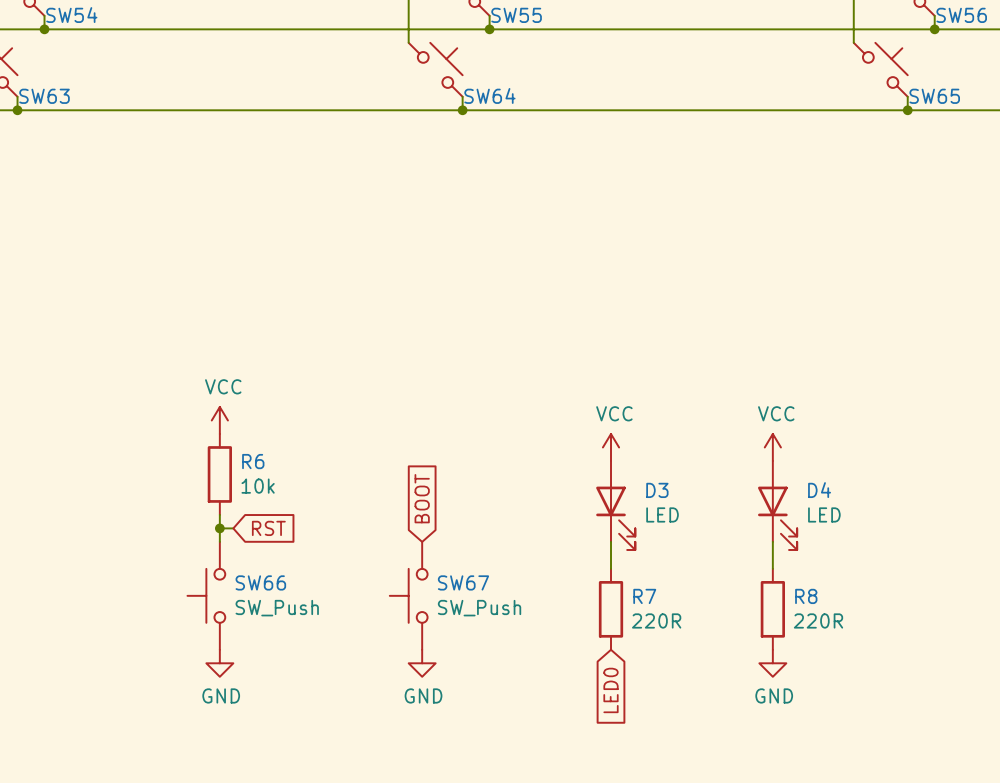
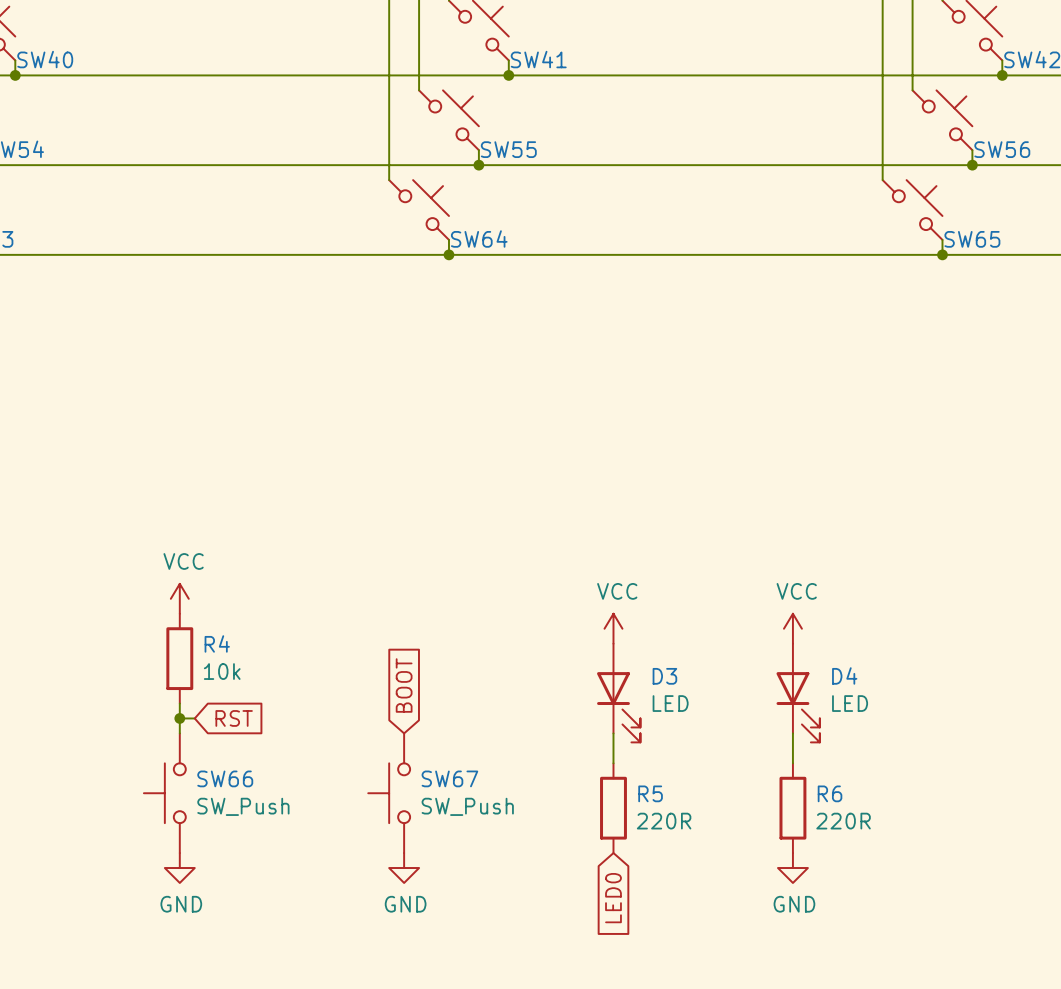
R6 name: R6 (253, 461) -> R4 (217, 643)
R7 name: R7 (644, 596) -> R5 (650, 793)
R8 name: R8 (806, 596) -> R6 (830, 793)

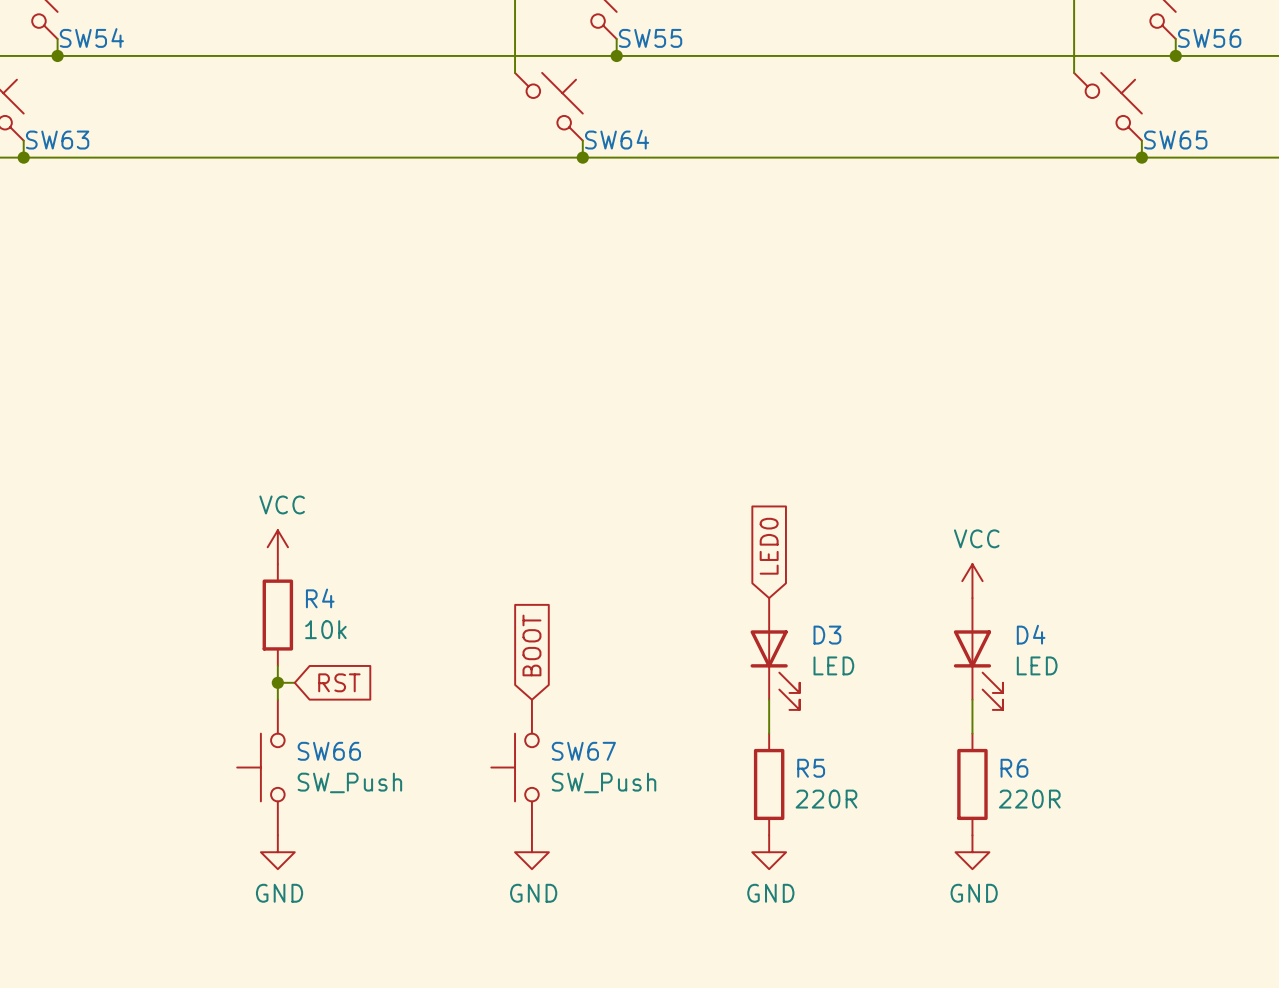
power symbol: VCC (613, 628) -> none
power symbol: none -> GND (769, 852)
global label rotation: 0° (613, 898) -> 180° (769, 546)
global label position: LED0 (613, 898) -> LED0 (769, 546)

